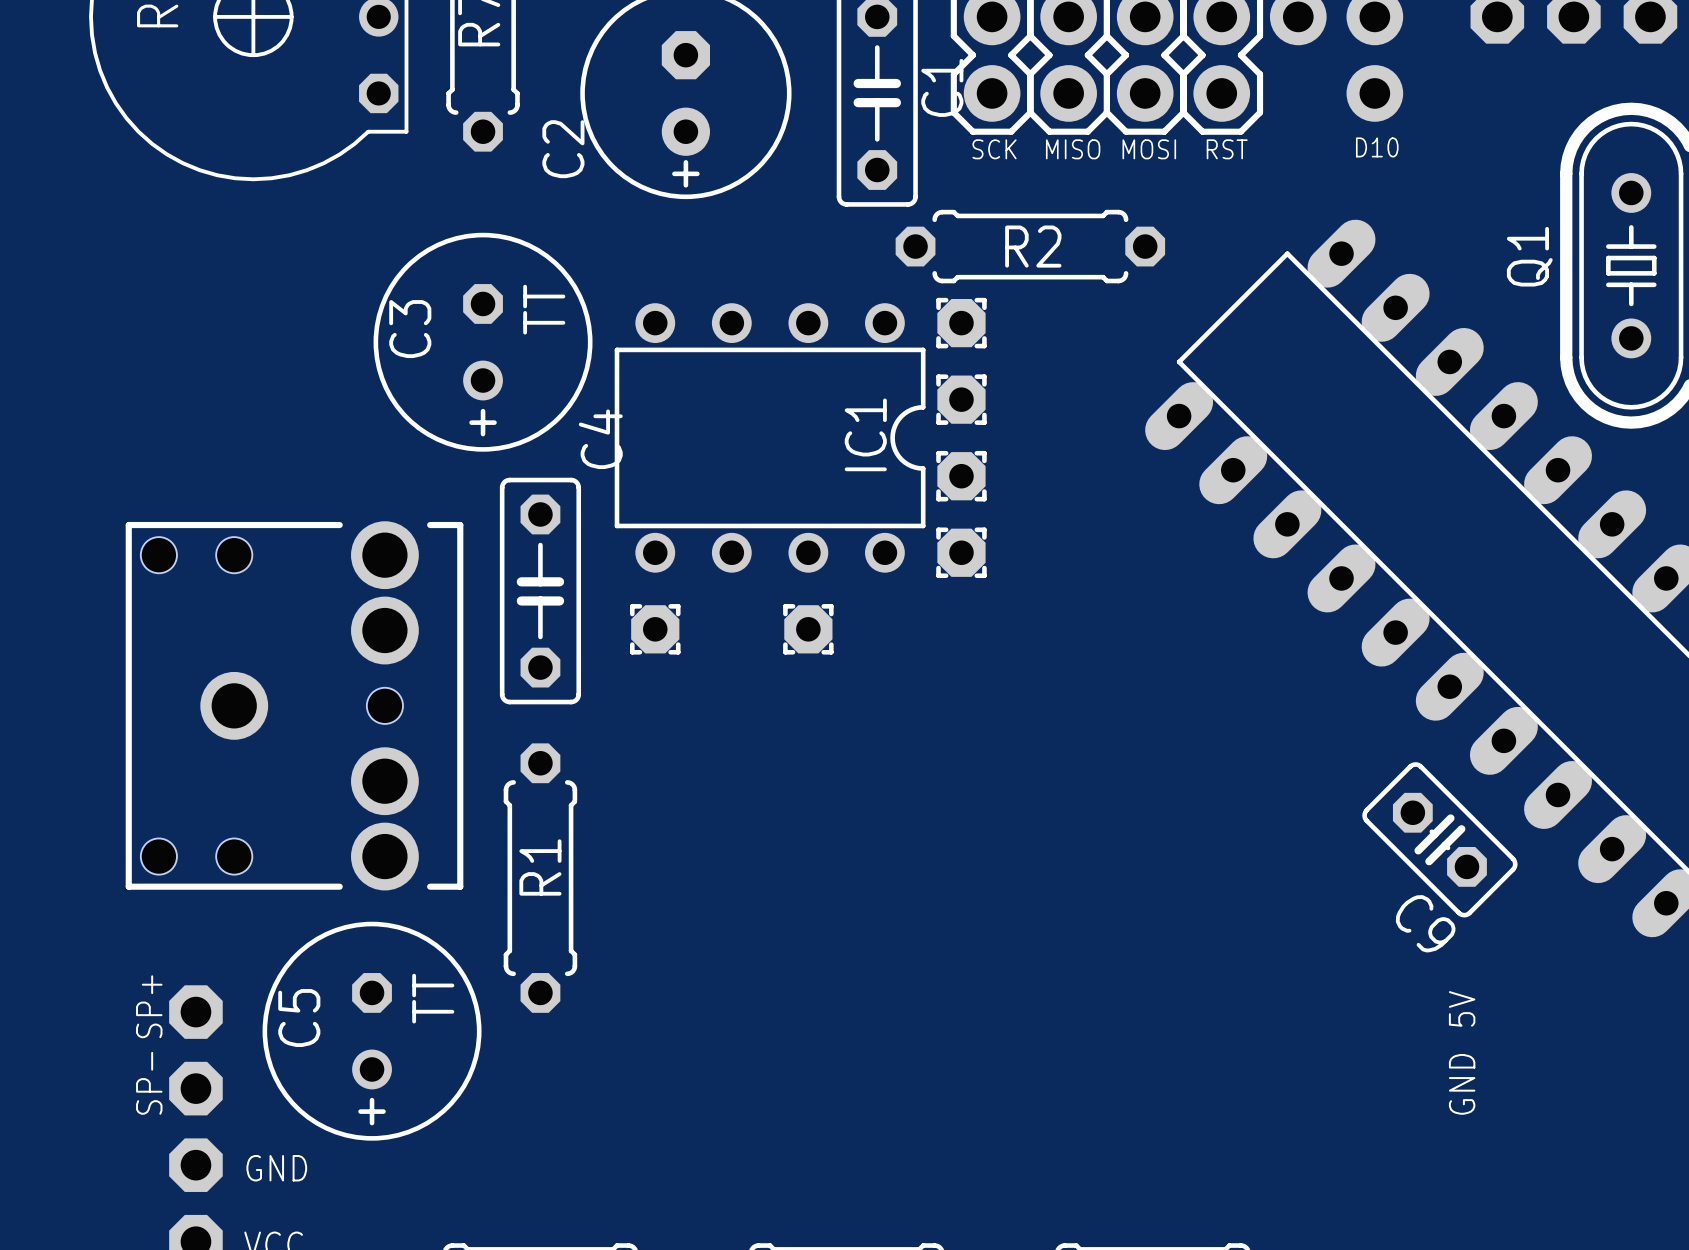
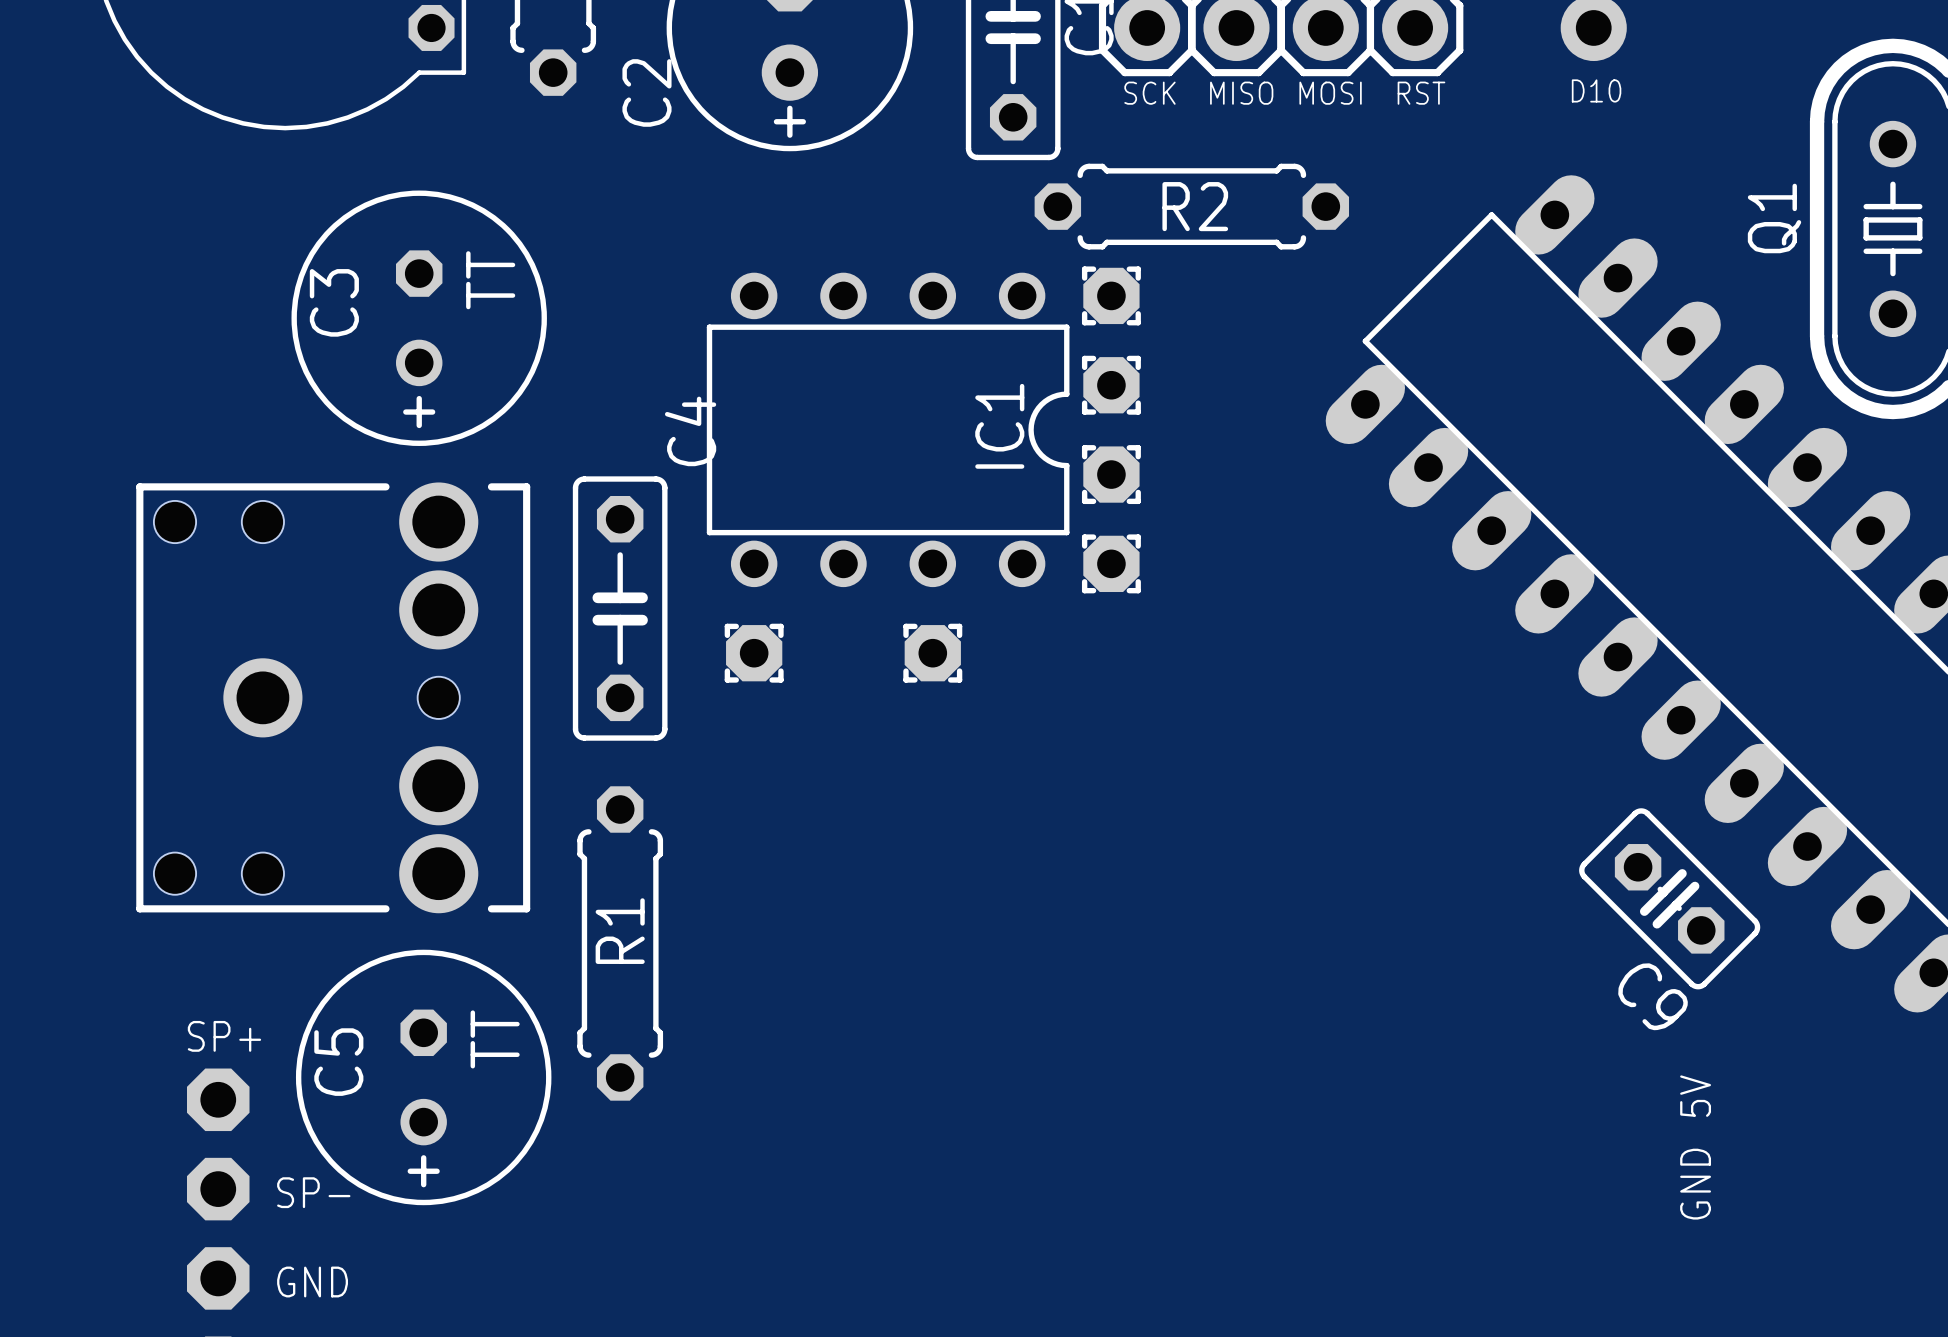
C3 position: (483, 342) -> (419, 318)
part position: (294, 705) -> (333, 697)
text rotation: 0° (149, 1006) -> 90° clockwise (224, 1036)
C5 position: (372, 1031) -> (423, 1077)
text rotation: 0° (149, 1083) -> 90° clockwise (313, 1192)
text position: SP- (149, 1083) -> SP- (313, 1192)

